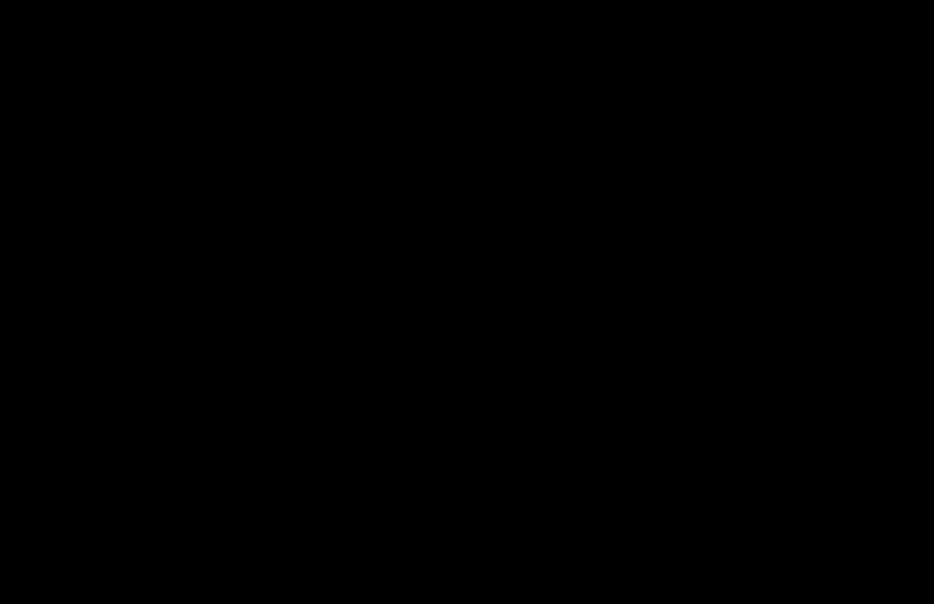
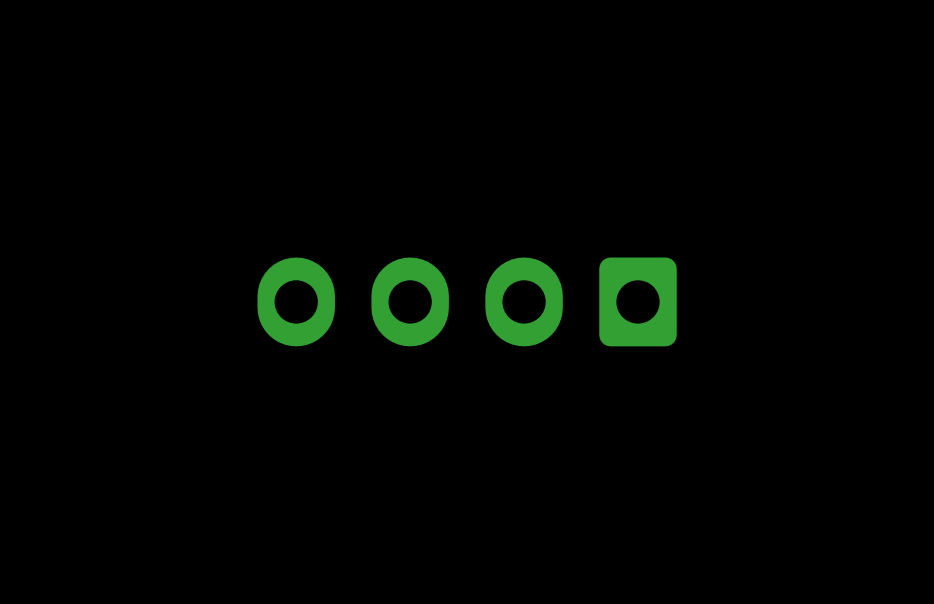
part: none -> (467, 301)

